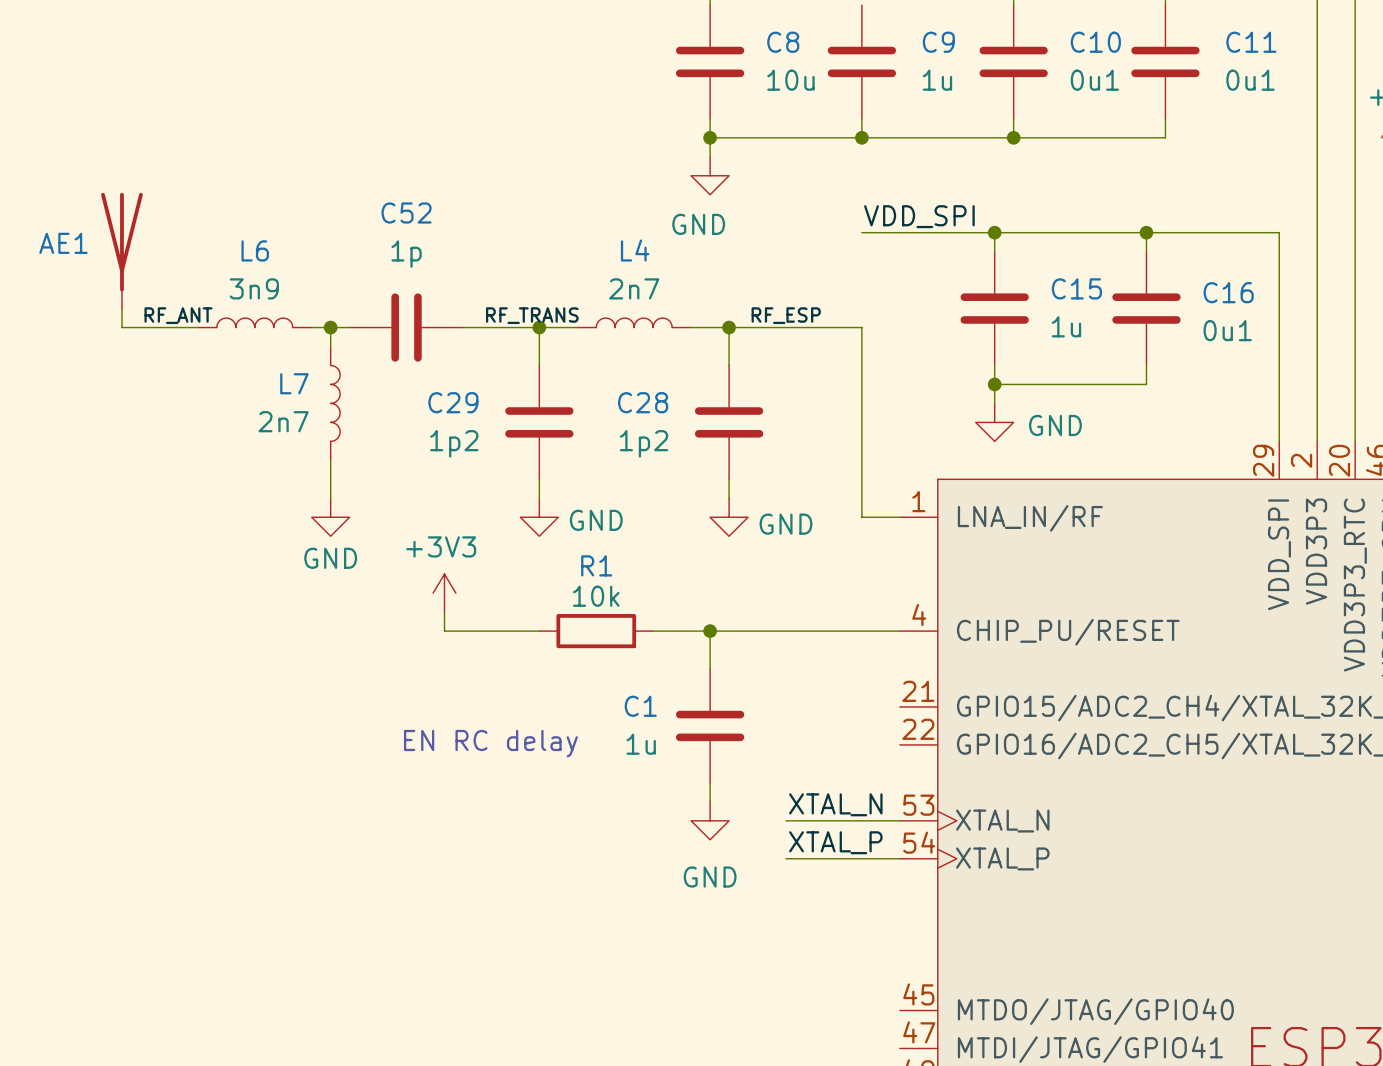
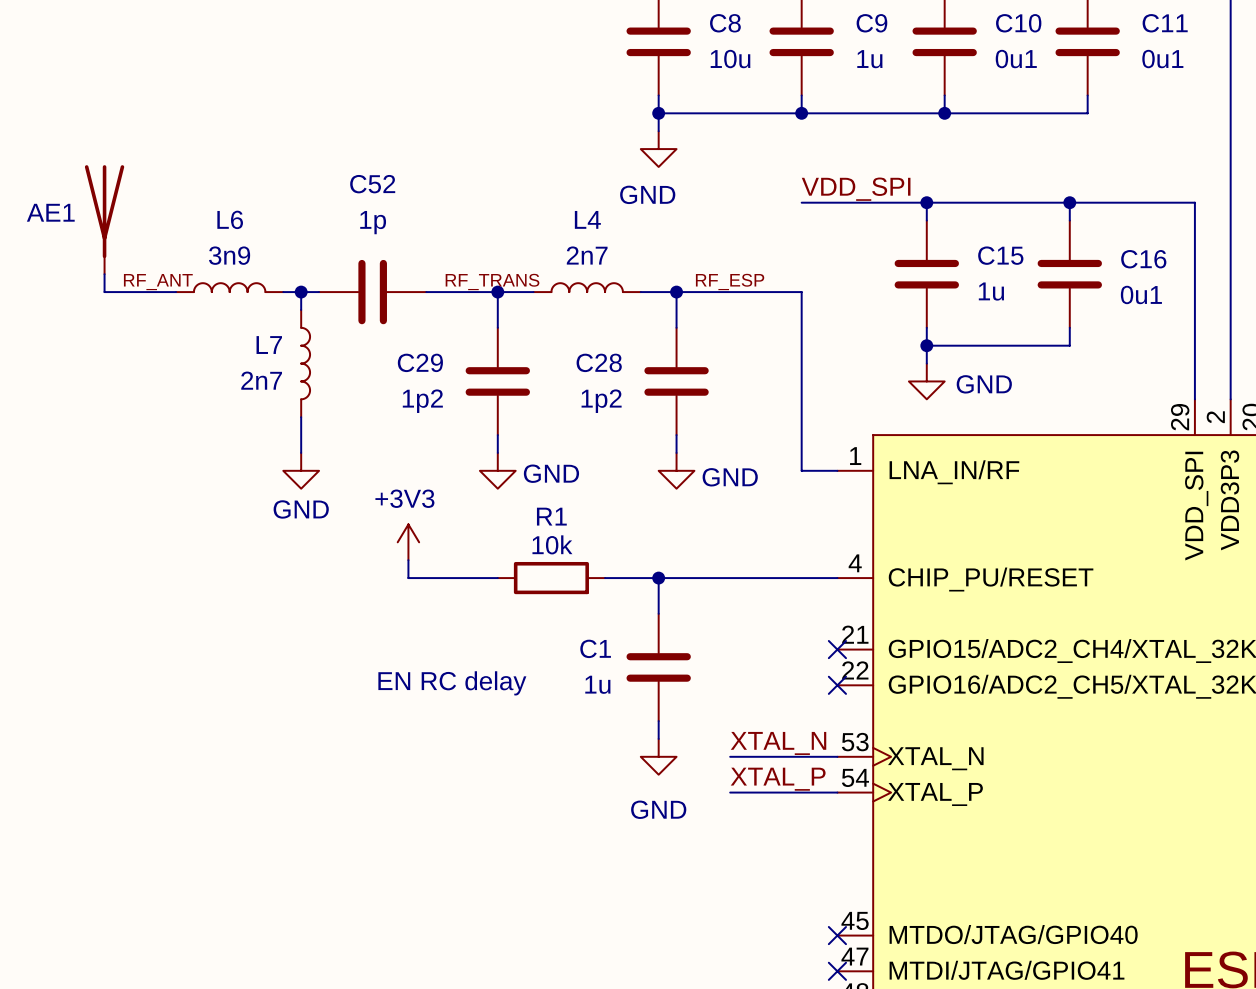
no-connect mark: none -> (837, 649)
no-connect mark: none -> (837, 685)
no-connect mark: none -> (837, 935)
no-connect mark: none -> (837, 971)

